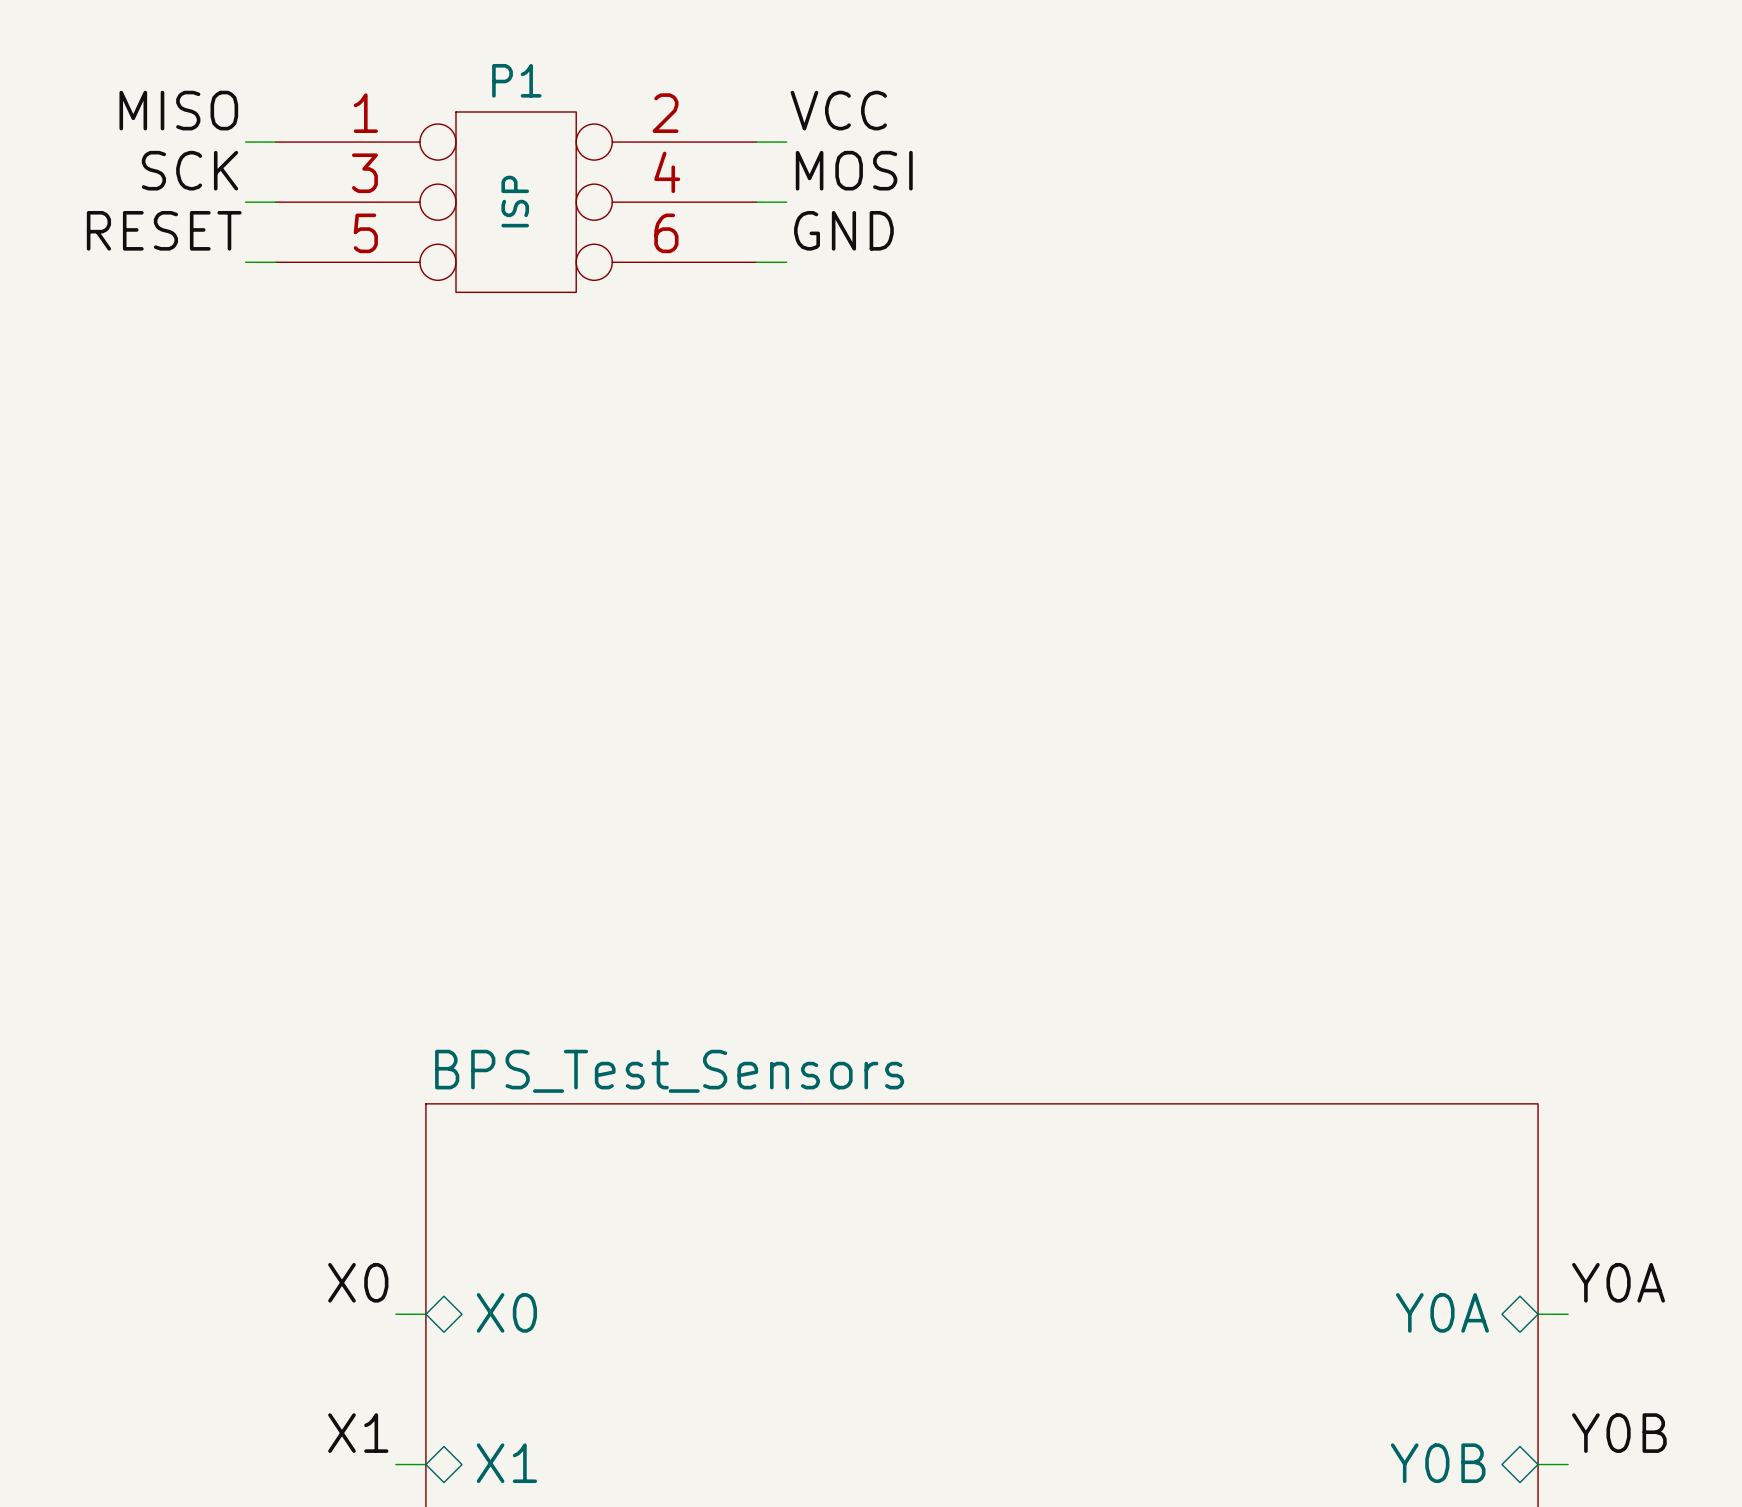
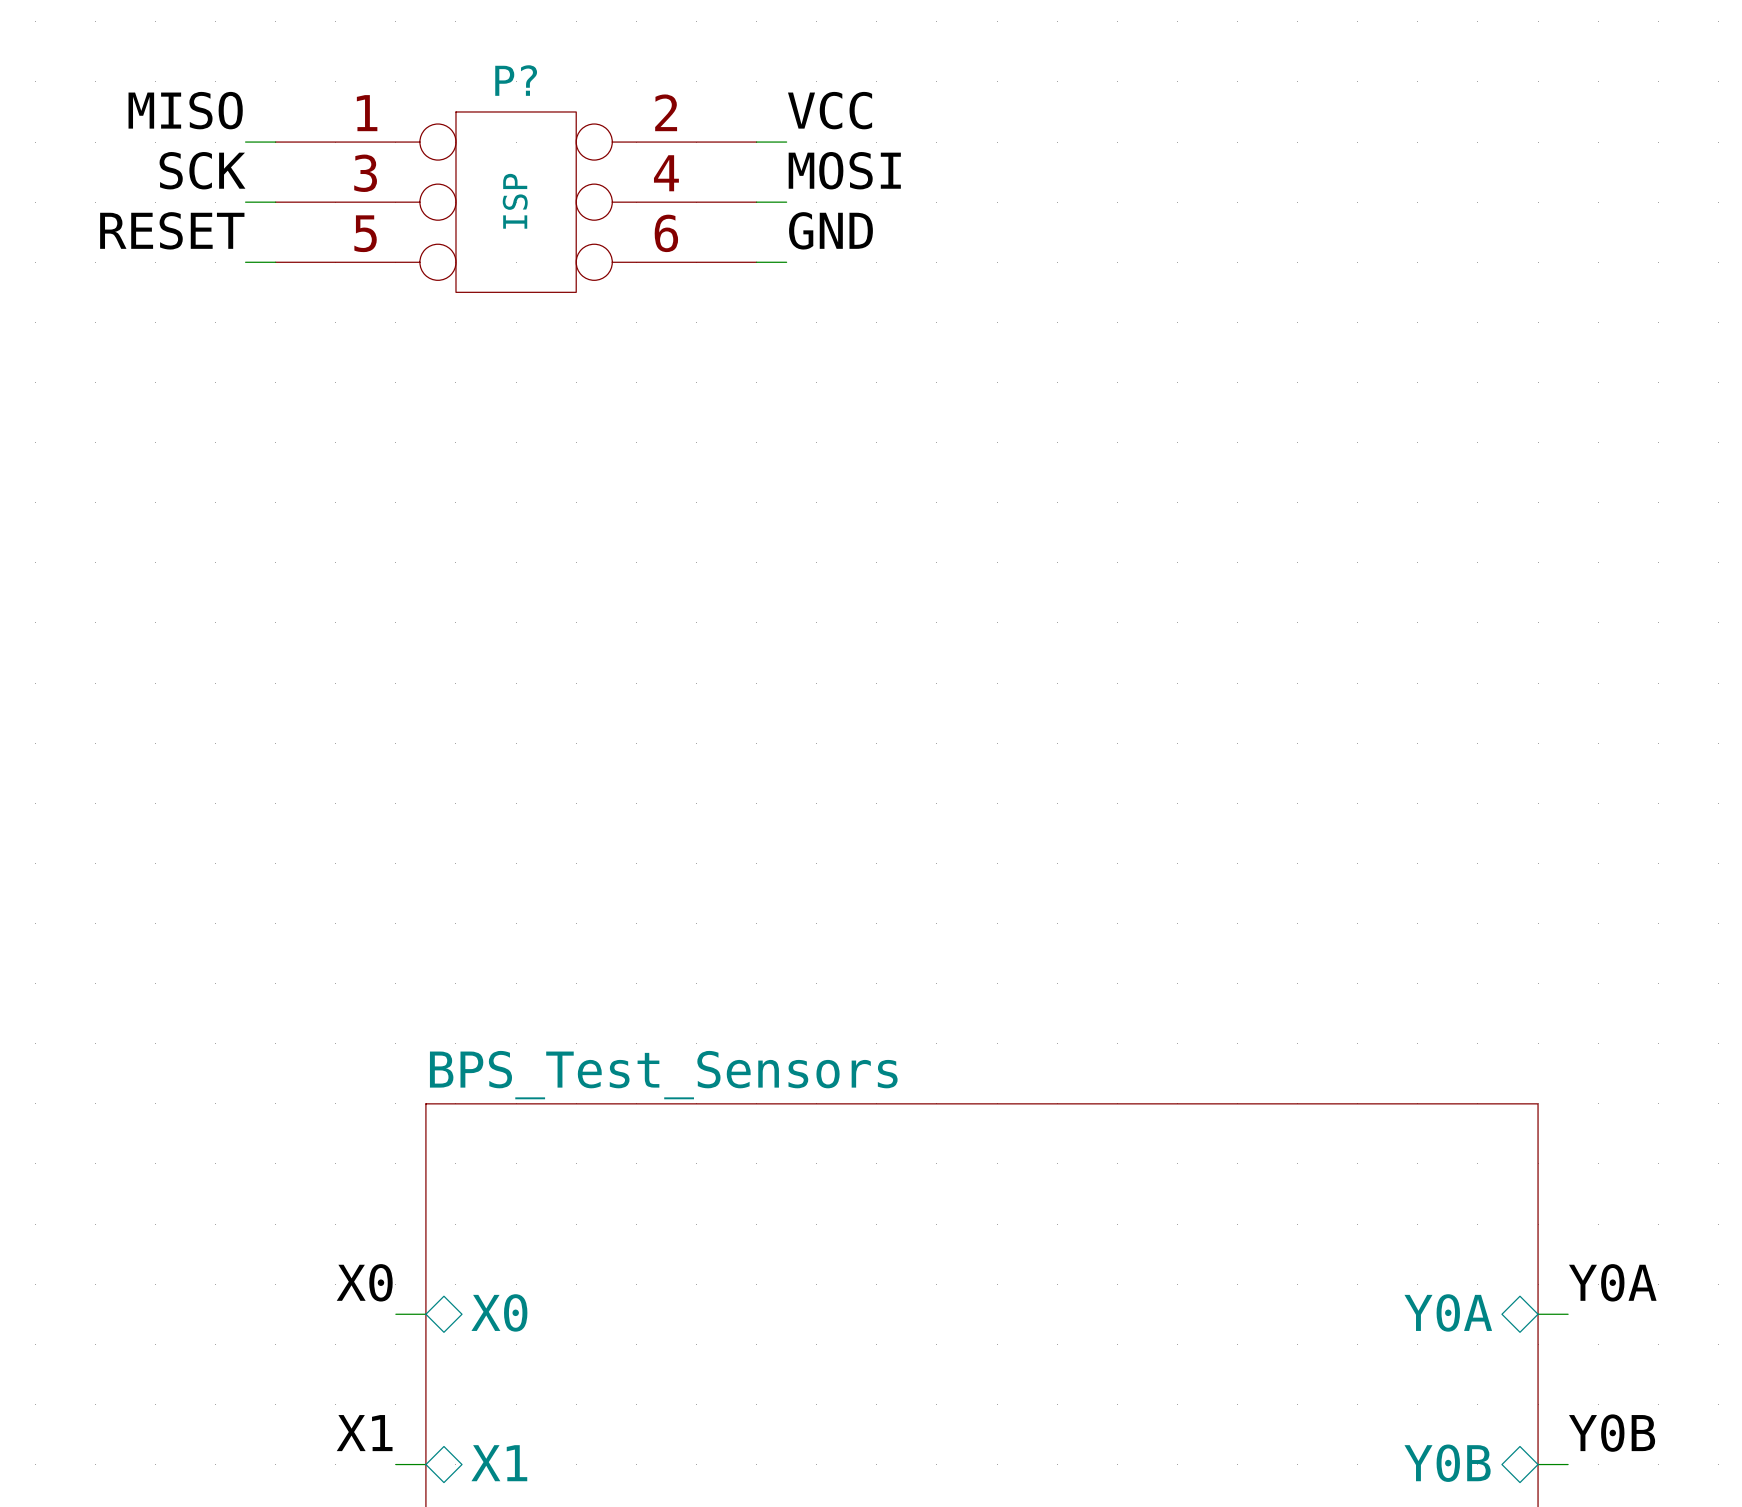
P1 name: P1 (516, 80) -> P? (516, 80)

